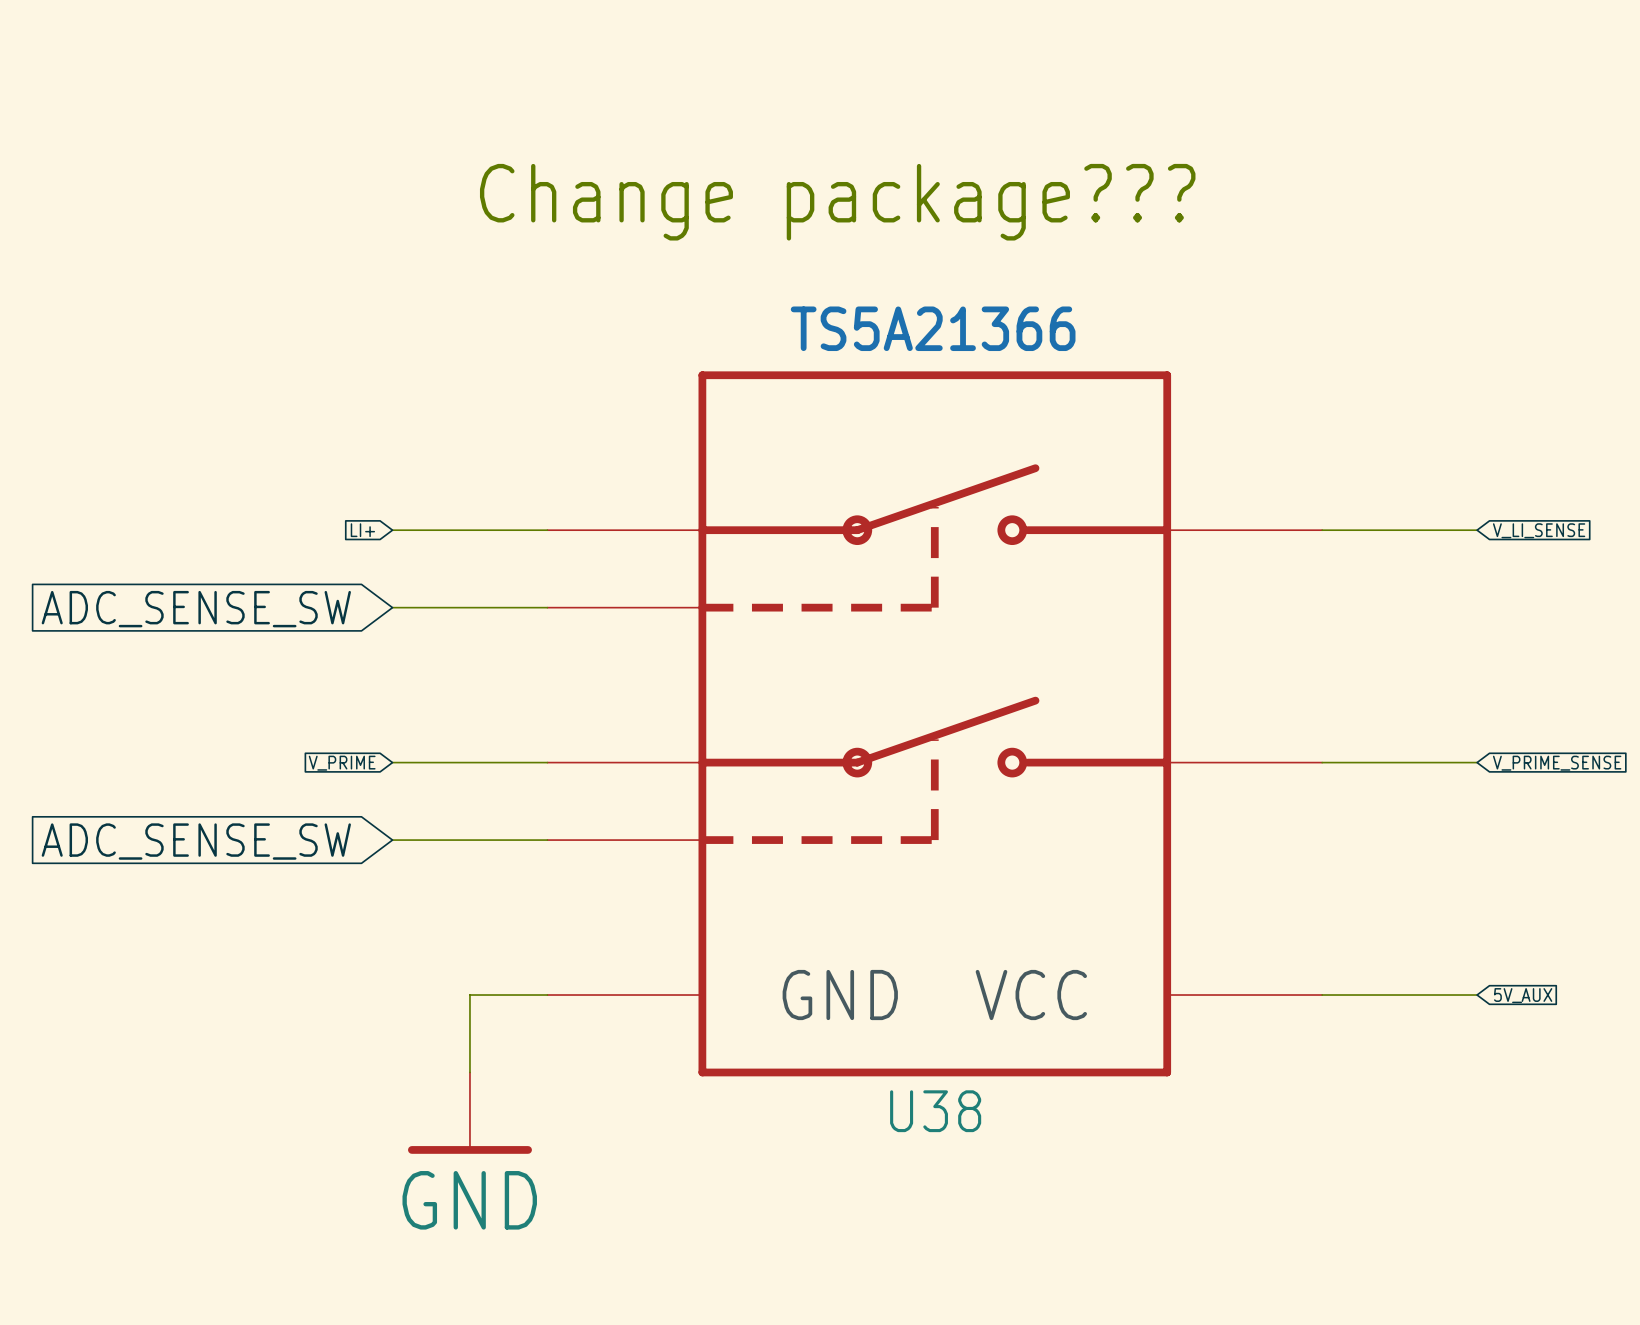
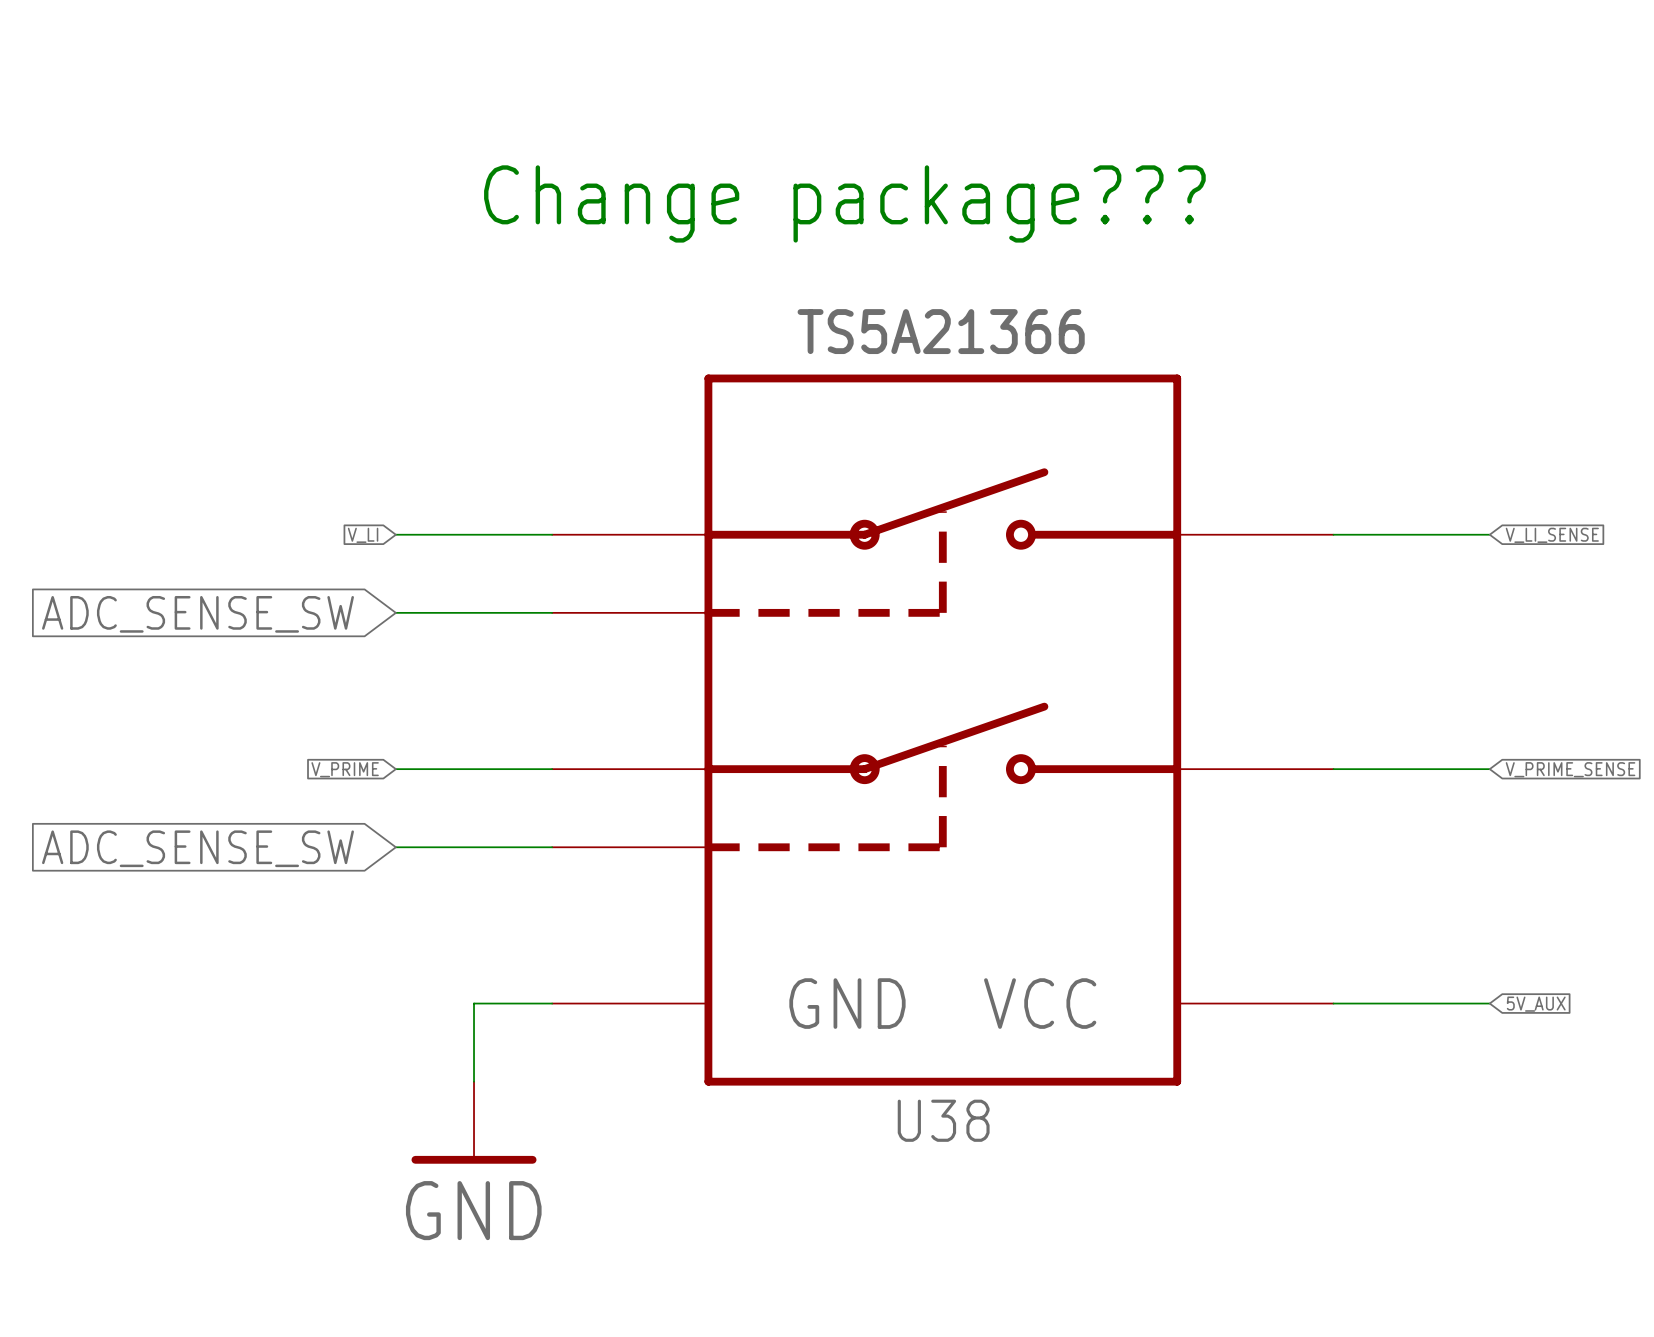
global label: LI+ (362, 530) -> V_LI (363, 535)

